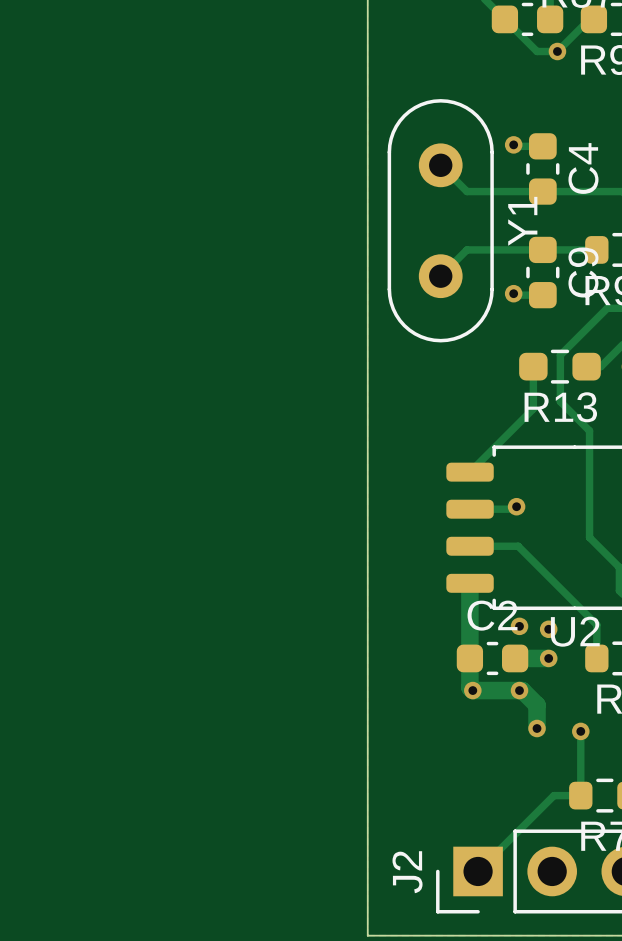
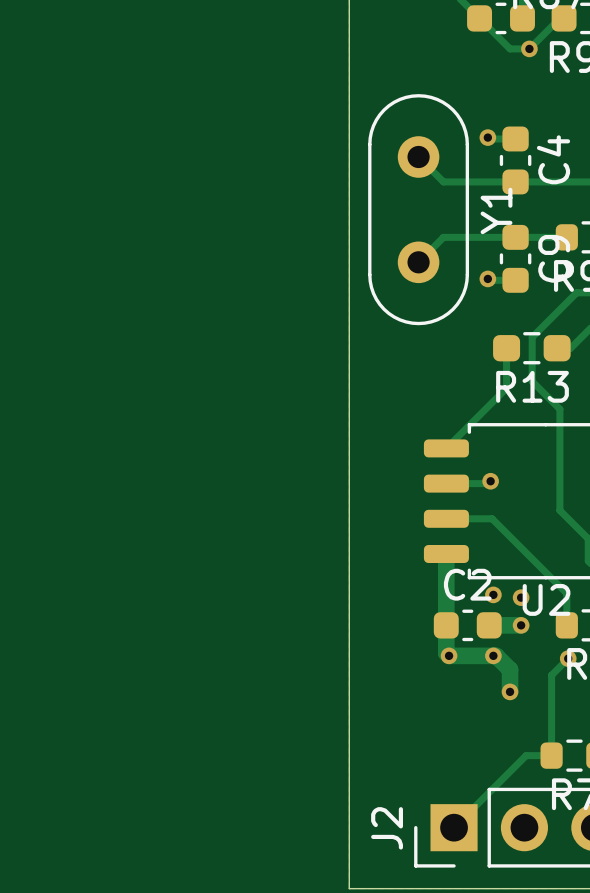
track: none -> (568, 658) (551, 675) (551, 694)
via: none -> (568, 658)
via: (580, 731) -> none

